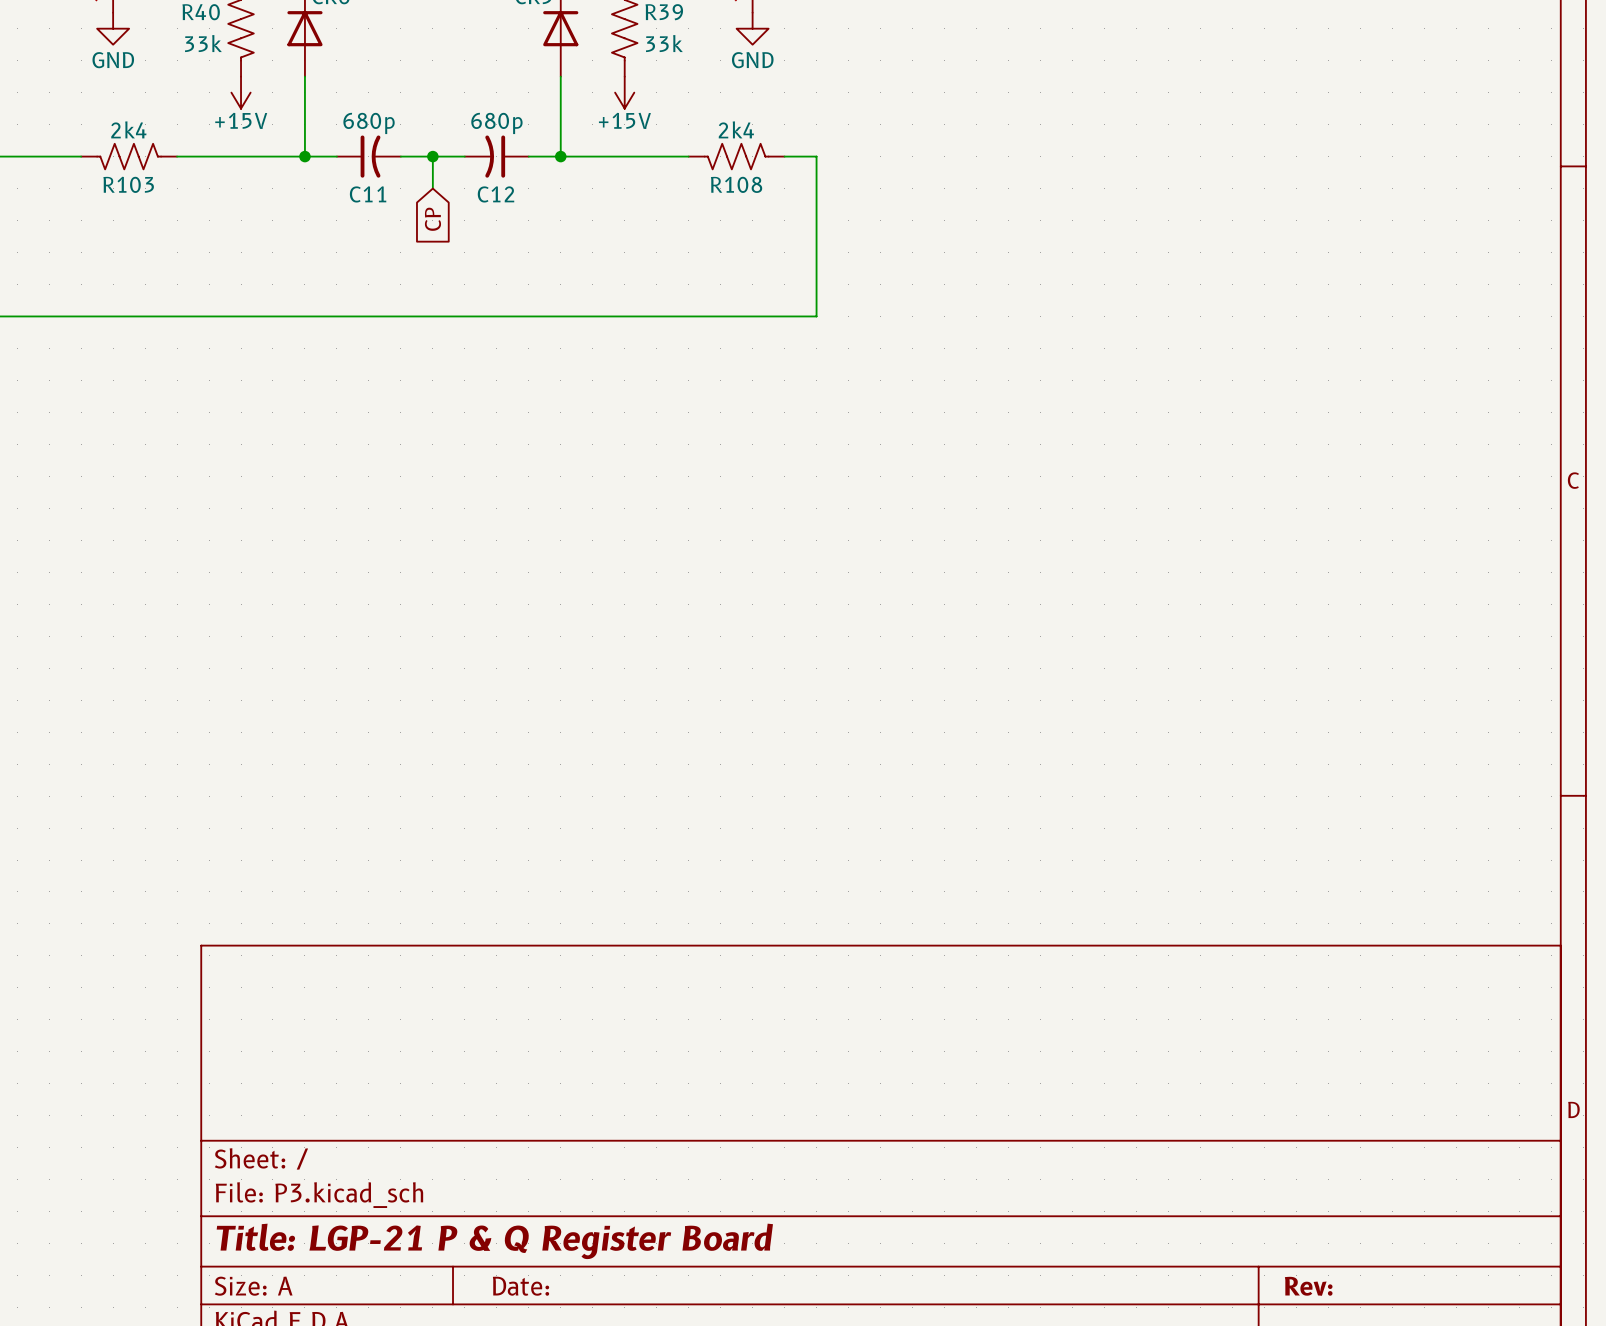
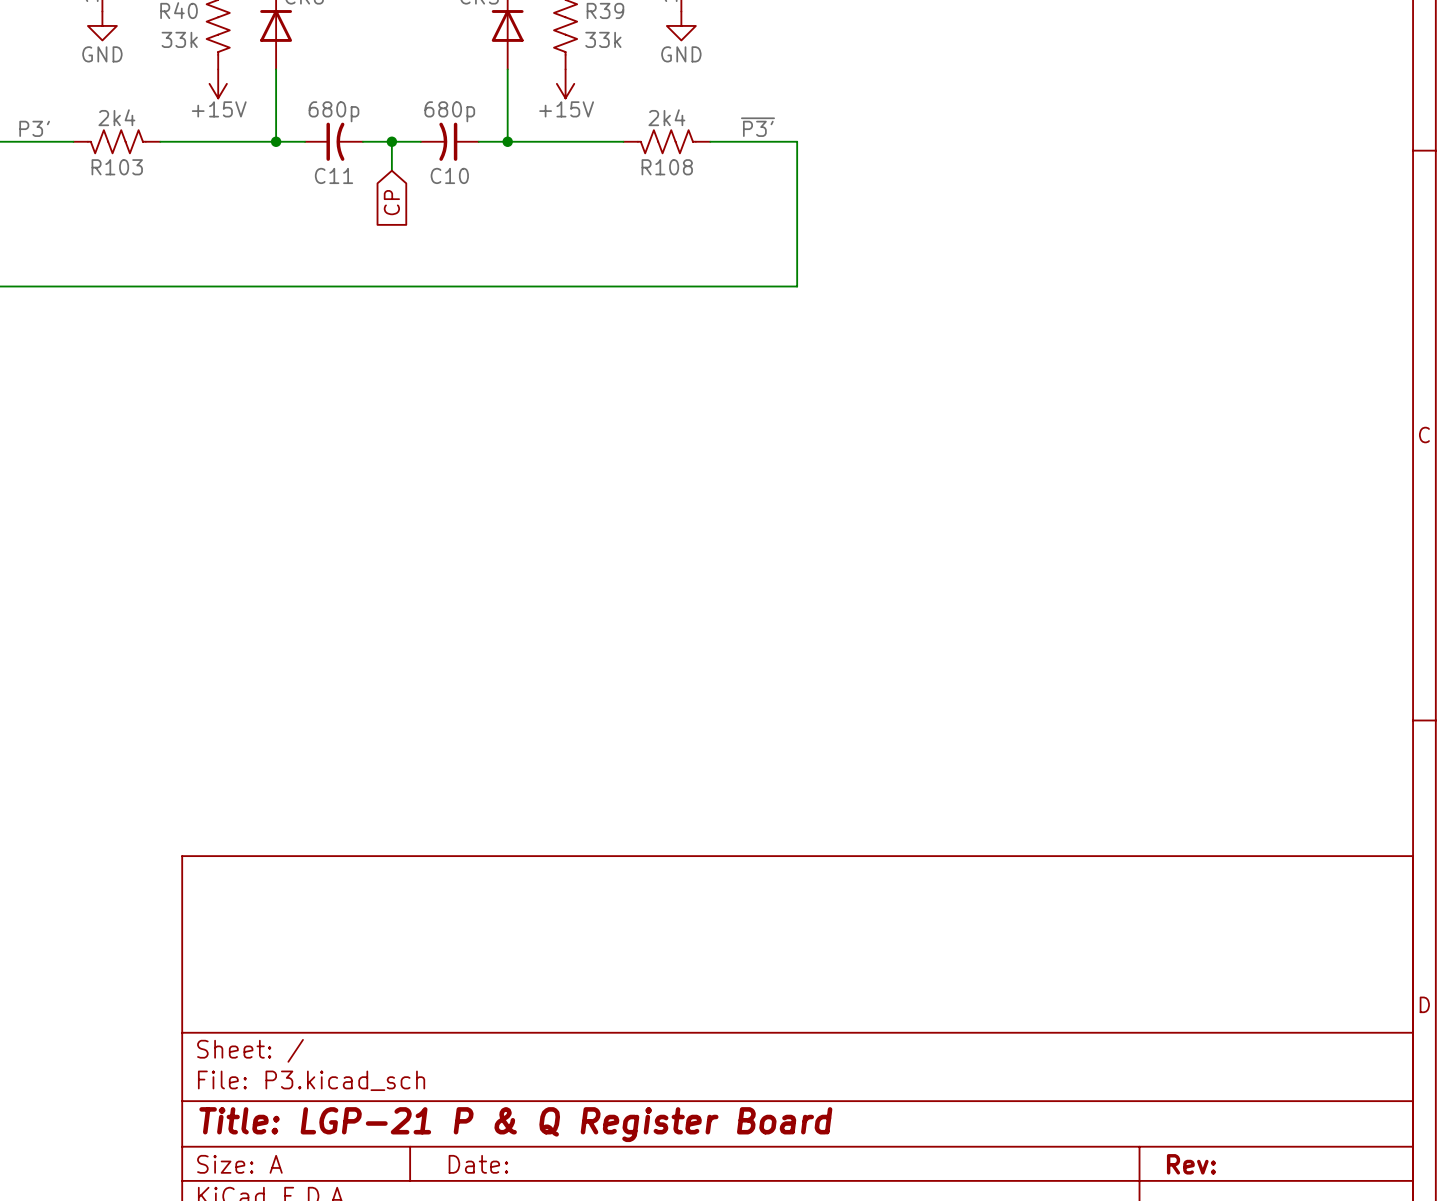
label: none -> ~{P3'} (757, 127)
label: none -> P3' (34, 128)
wire: (816, 156) (816, 316) -> (739, 141) (797, 141) (797, 286) (739, 286)
C12 name: C12 (495, 194) -> C10 (449, 175)

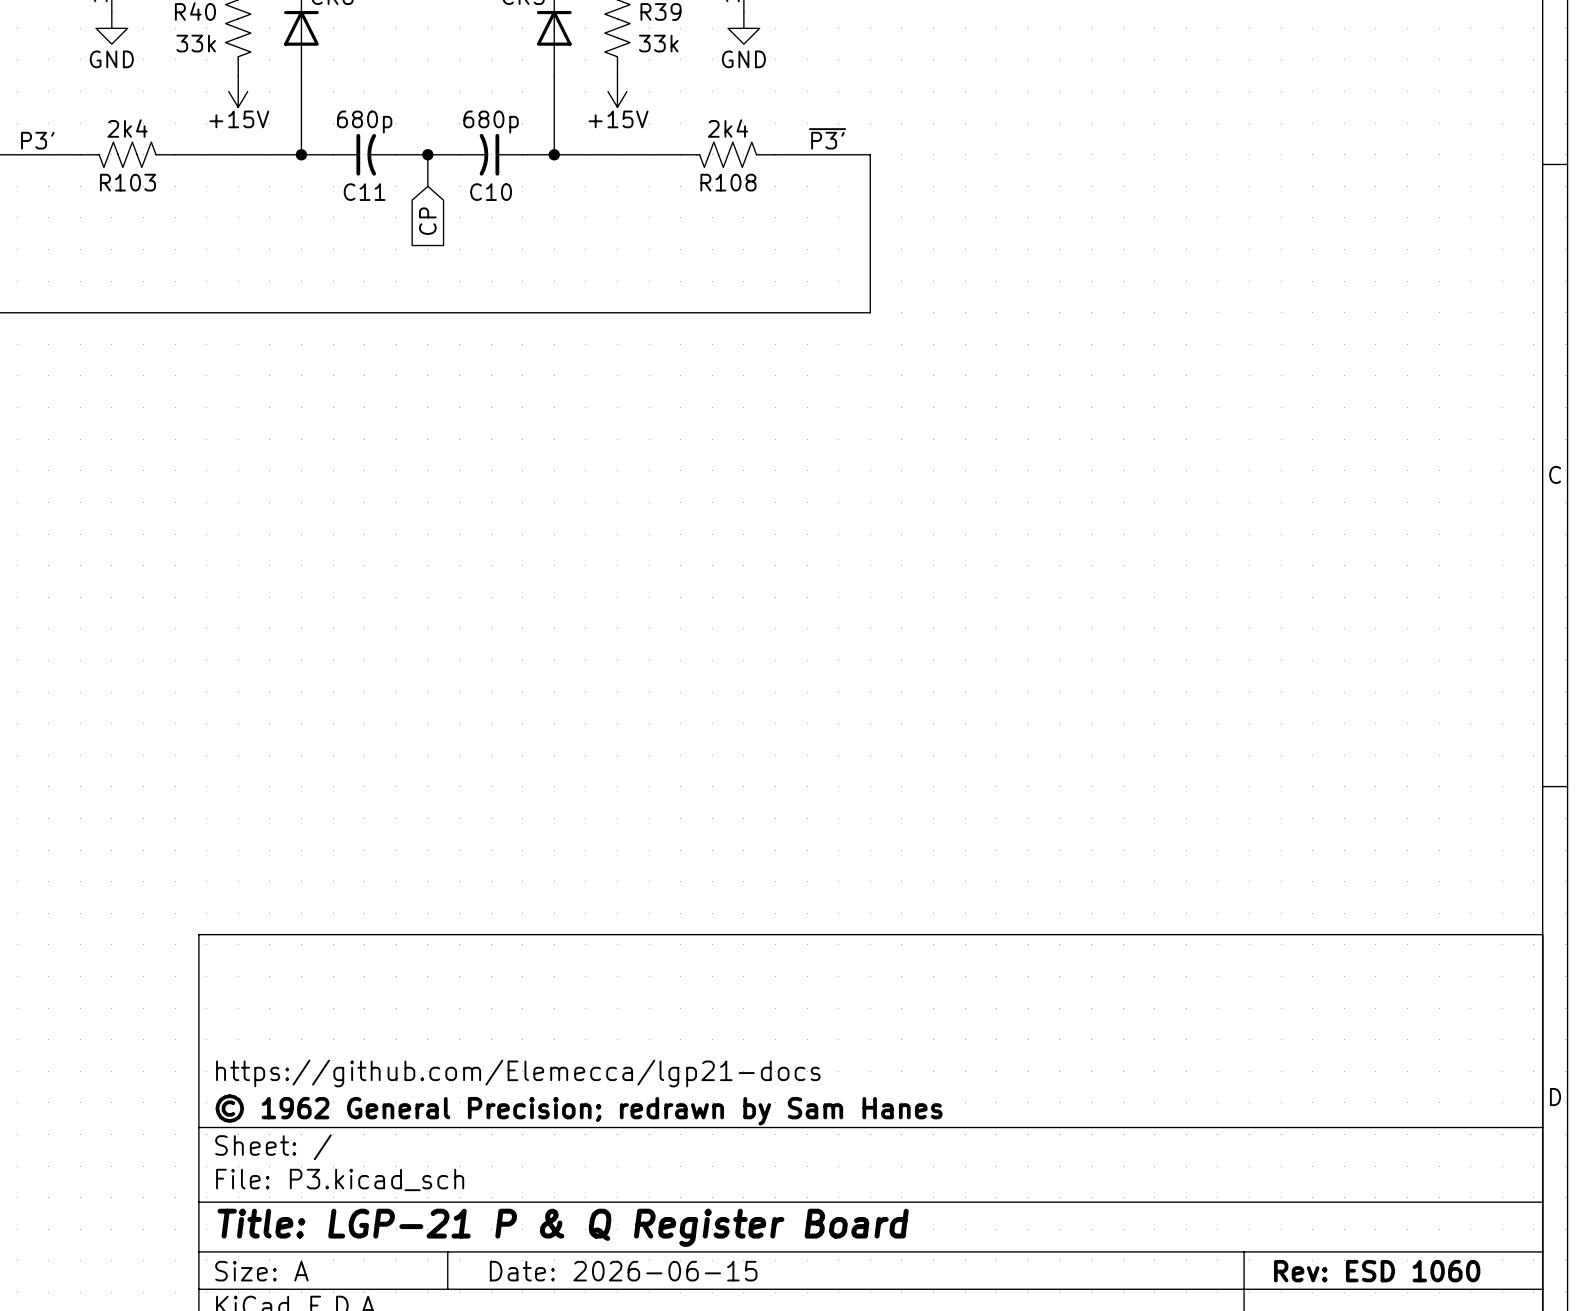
title block: none -> https://github.com/Elemecca/lgp21-docs (518, 1073)
title block: none -> © 1962 General Precision; redrawn by Sam Hanes (579, 1109)
title block: Date: (478, 1164) -> Date: 2026-06-15 (623, 1271)
title block: Rev: (1191, 1164) -> Rev: ESD 1060 (1377, 1271)

